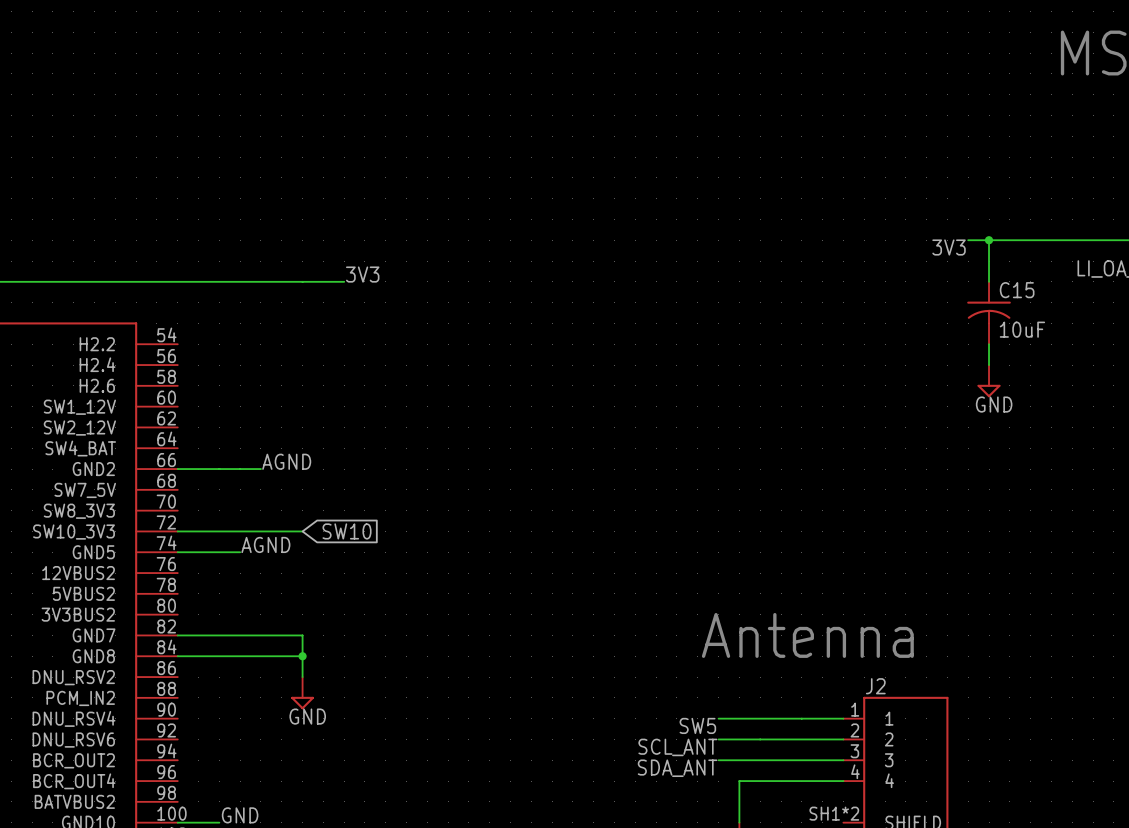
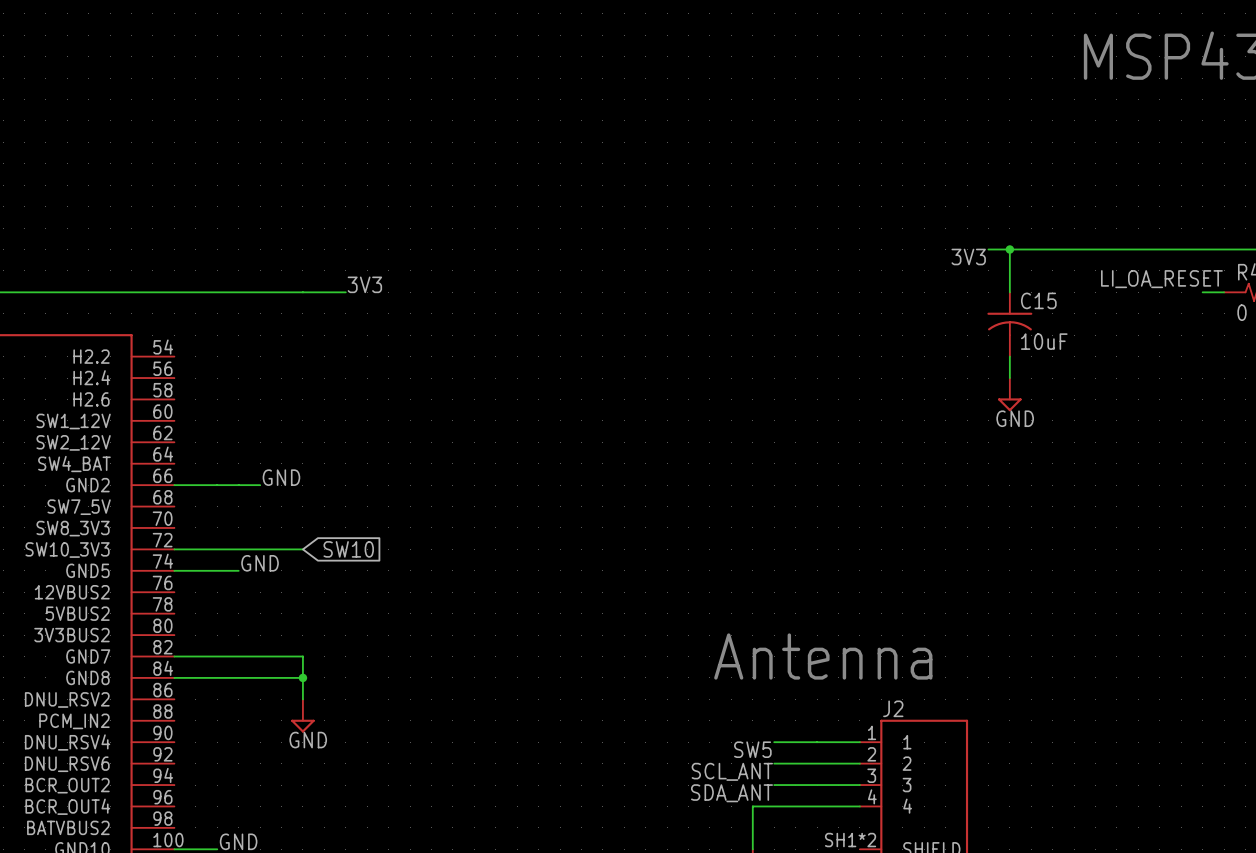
label: AGND (286, 461) -> GND (281, 477)
label: AGND (265, 544) -> GND (260, 563)
wire: (718, 718) (760, 718) -> none
label position: SW5 (697, 725) -> SW5 (752, 749)
wire: (718, 739) (760, 739) -> none
label position: SCL_ANT (677, 747) -> SCL_ANT (732, 771)
wire: (718, 760) (760, 760) -> none
label position: SDA_ANT (677, 768) -> SDA_ANT (731, 793)

